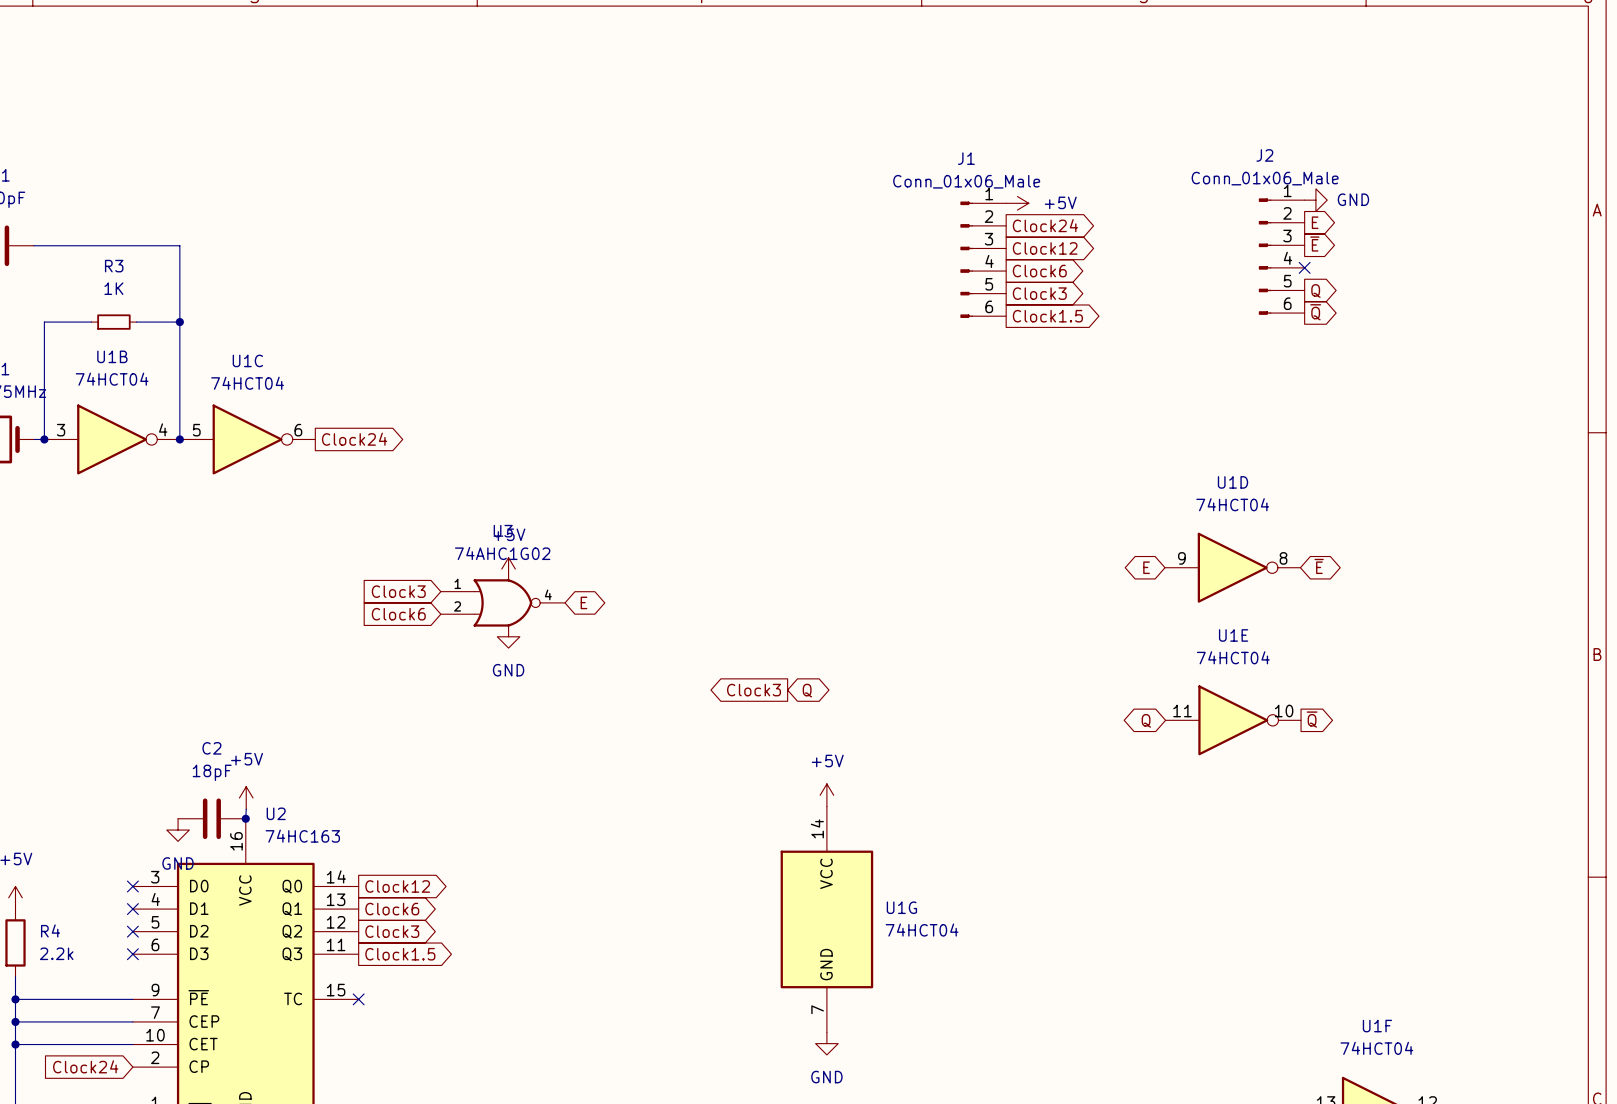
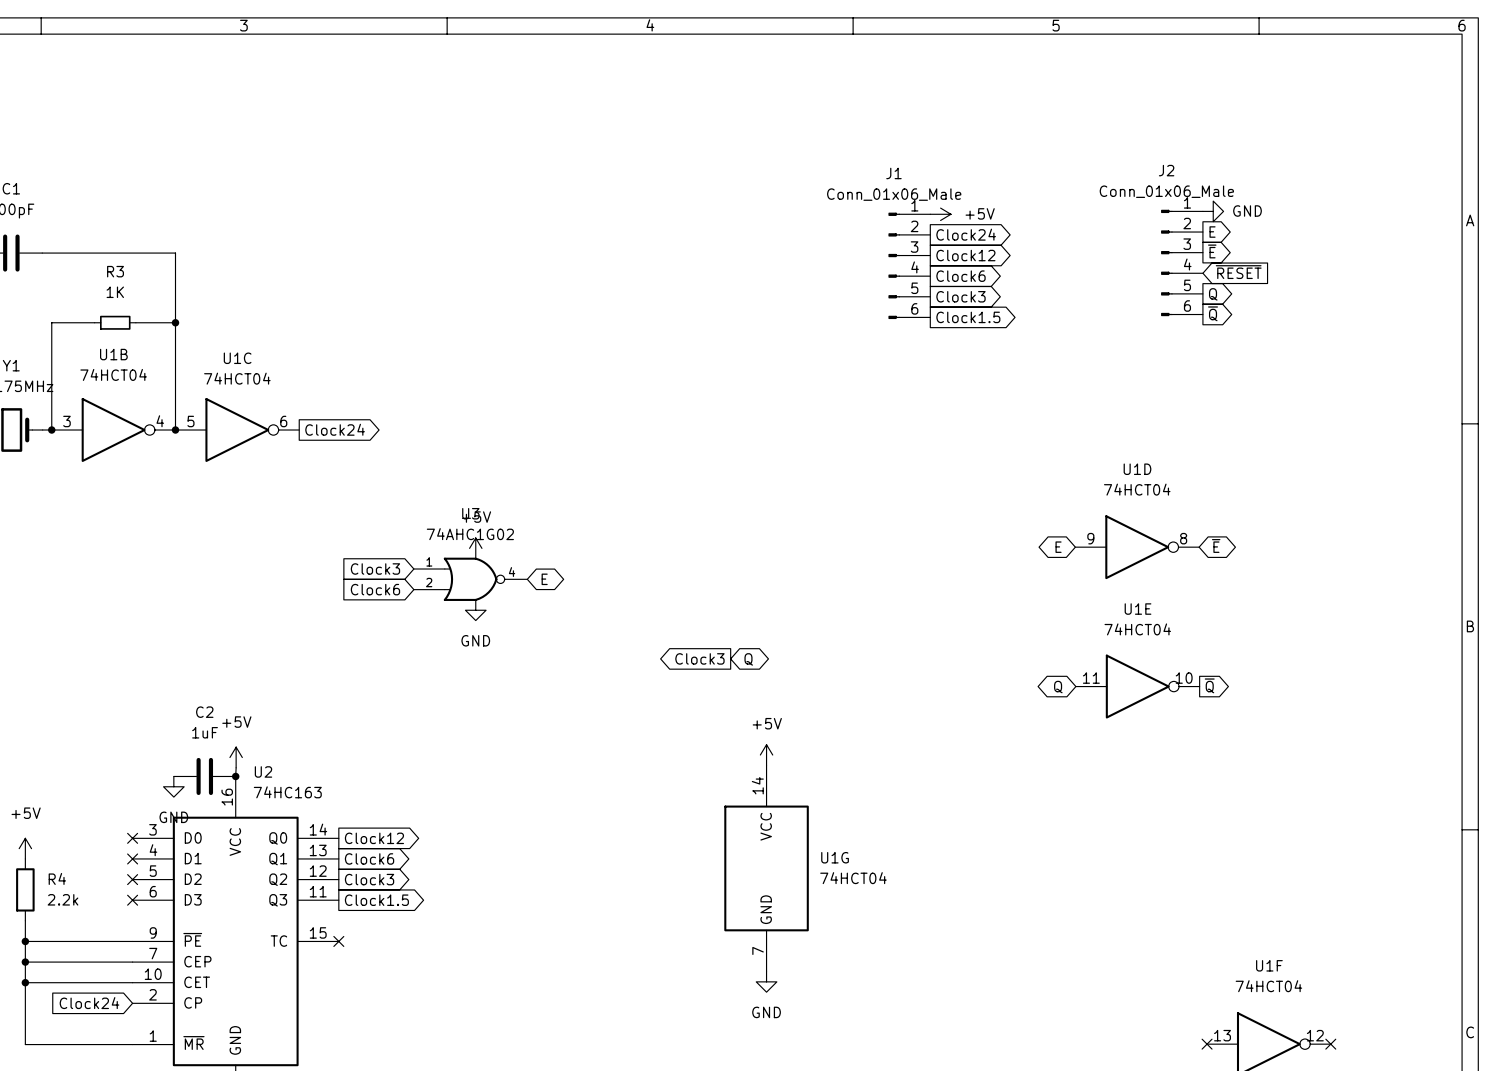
global label: none -> ~{RESET} (1238, 272)
no-connect mark: (1304, 267) -> none
C2 value: 18pF (212, 772) -> 1uF (205, 732)

